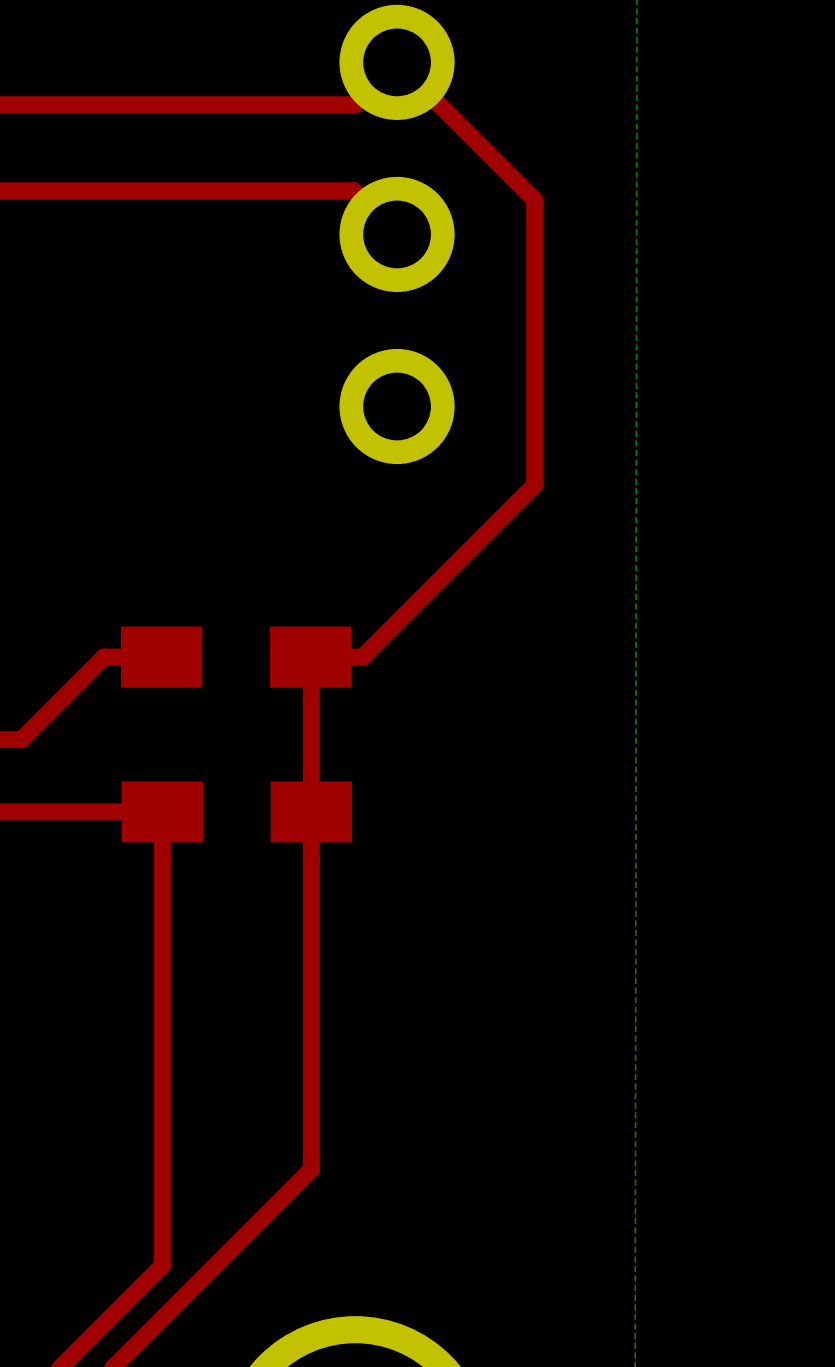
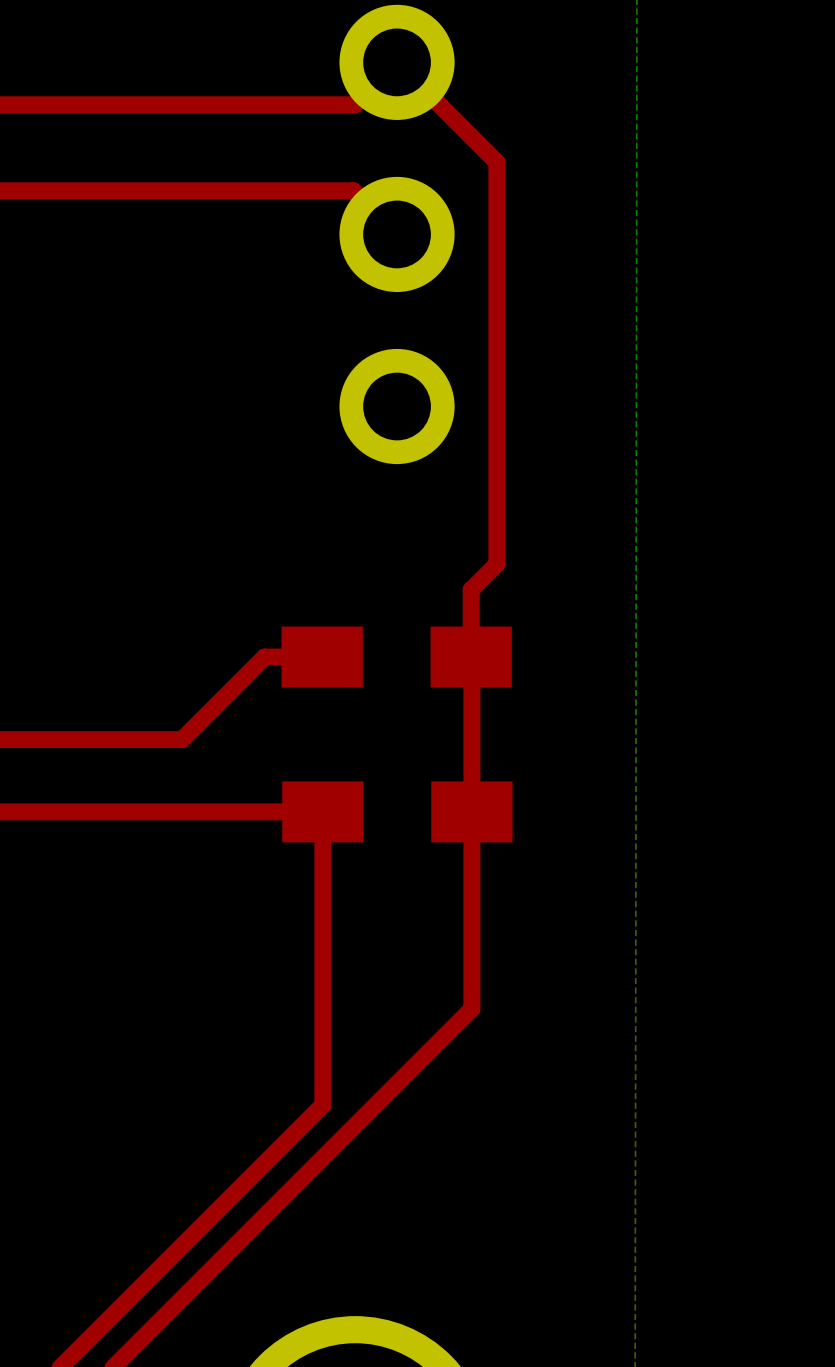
top track: (496, 162) (534, 200) (534, 484) (362, 657) (322, 657) -> (496, 162) (496, 564) (471, 589) (471, 657)
top track: (161, 657) (104, 657) (21, 739) -> (310, 657) (264, 657) (182, 739) (21, 739)
part: (236, 657) -> none
top track: (311, 657) (311, 1169) -> (471, 657) (471, 1008) (311, 1169)
part: none -> (396, 657)
top track: (162, 811) (162, 1265) -> (162, 811) (322, 811) (322, 1105) (162, 1265)
part: (236, 811) -> none
part: none -> (397, 811)

